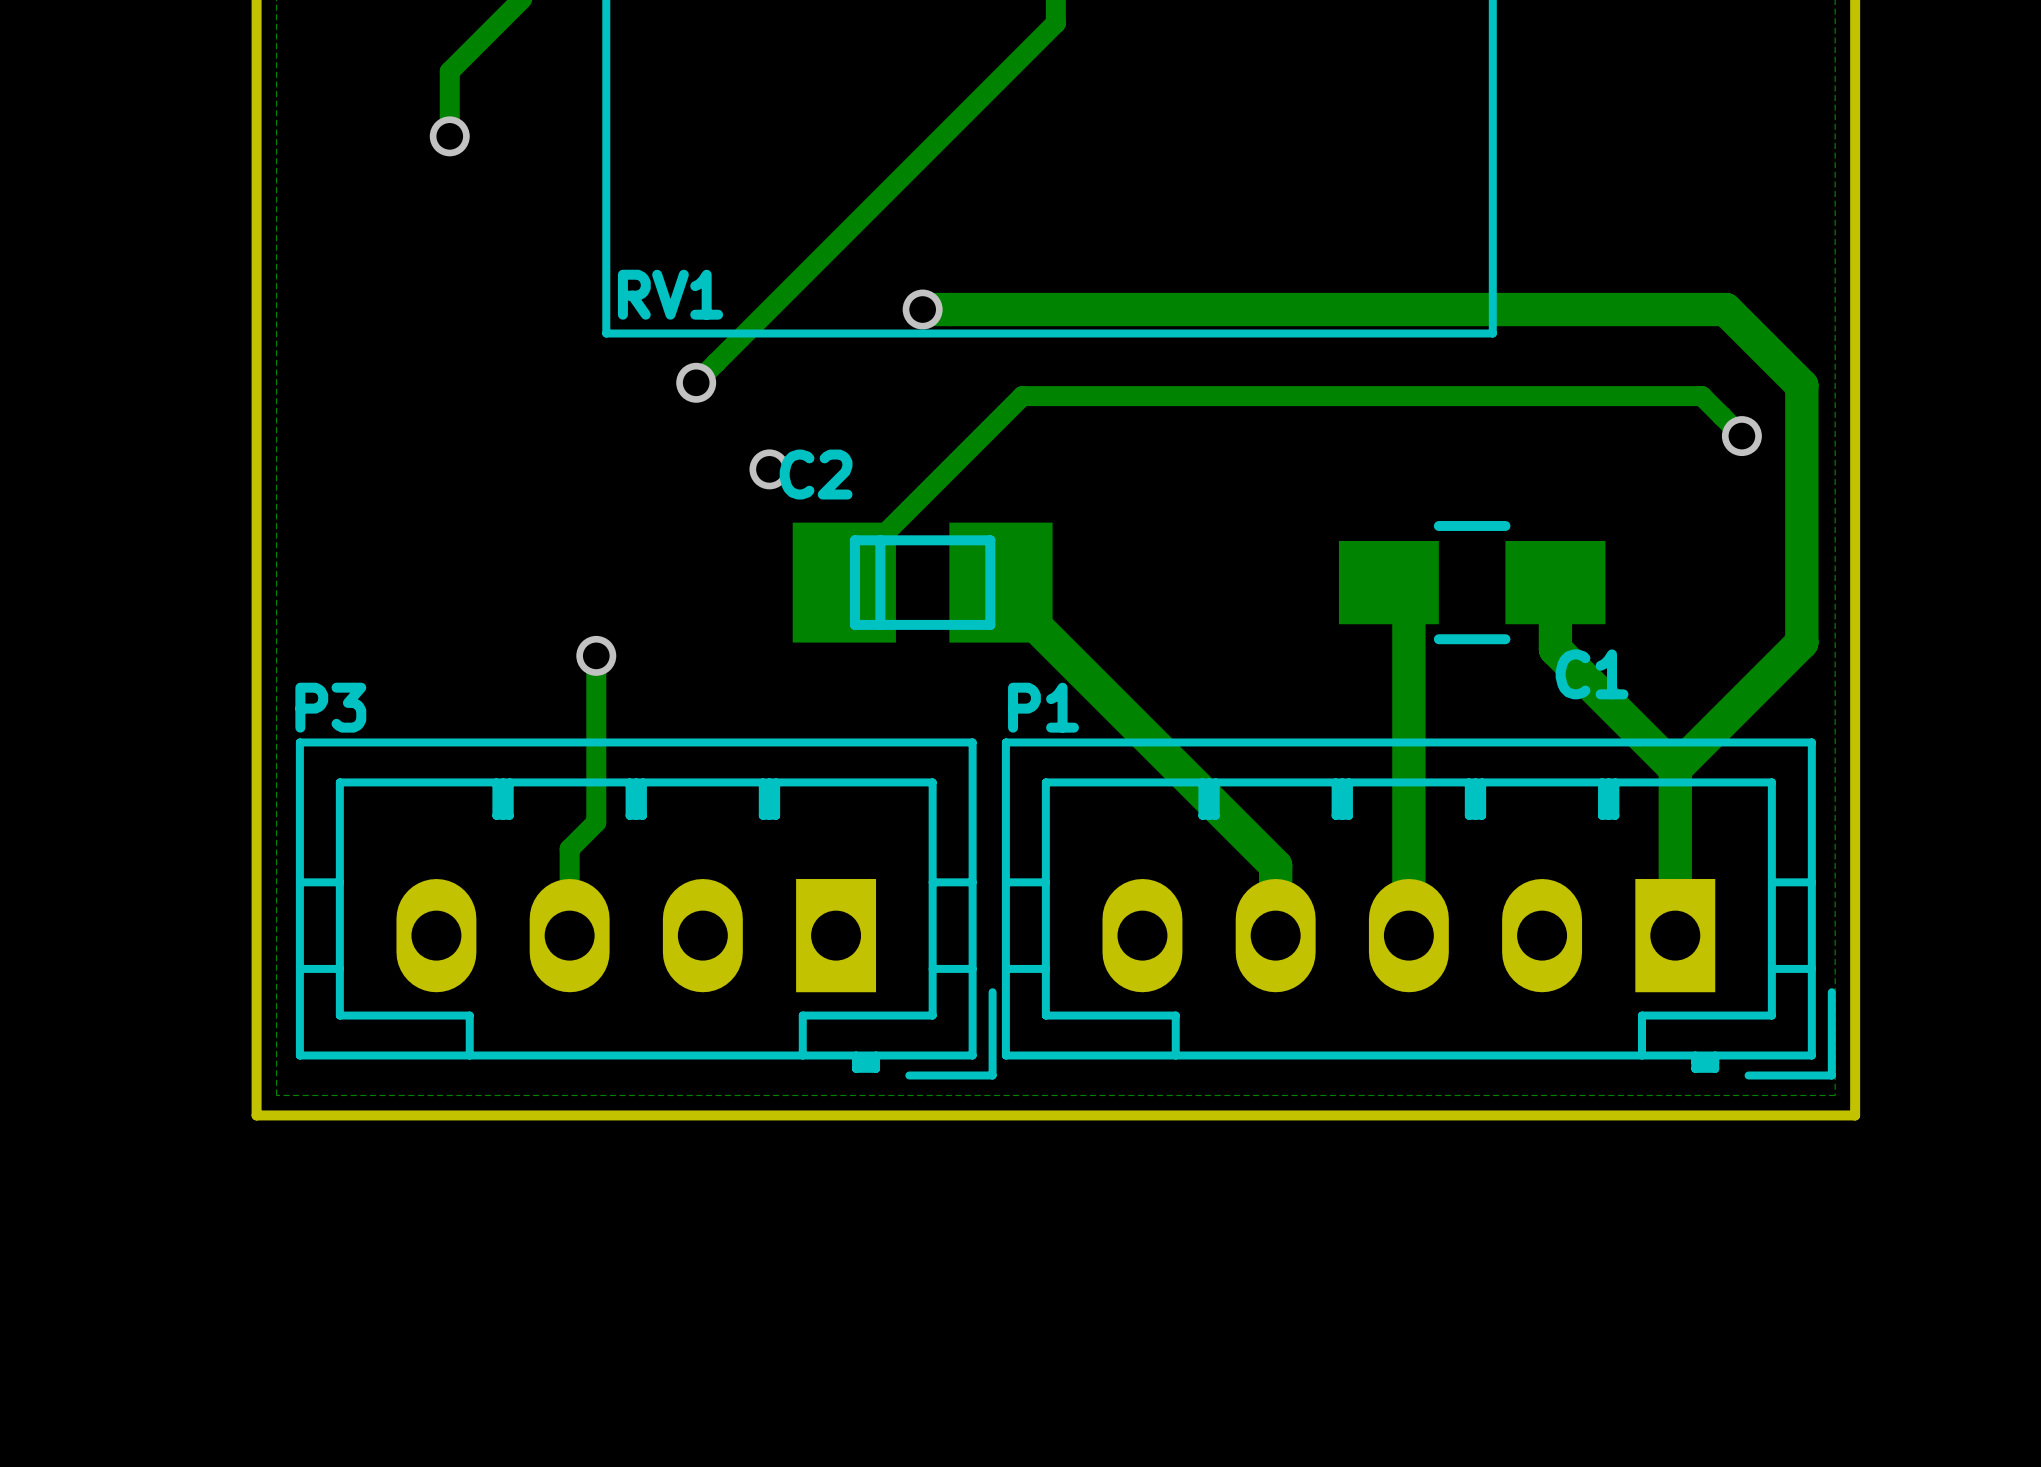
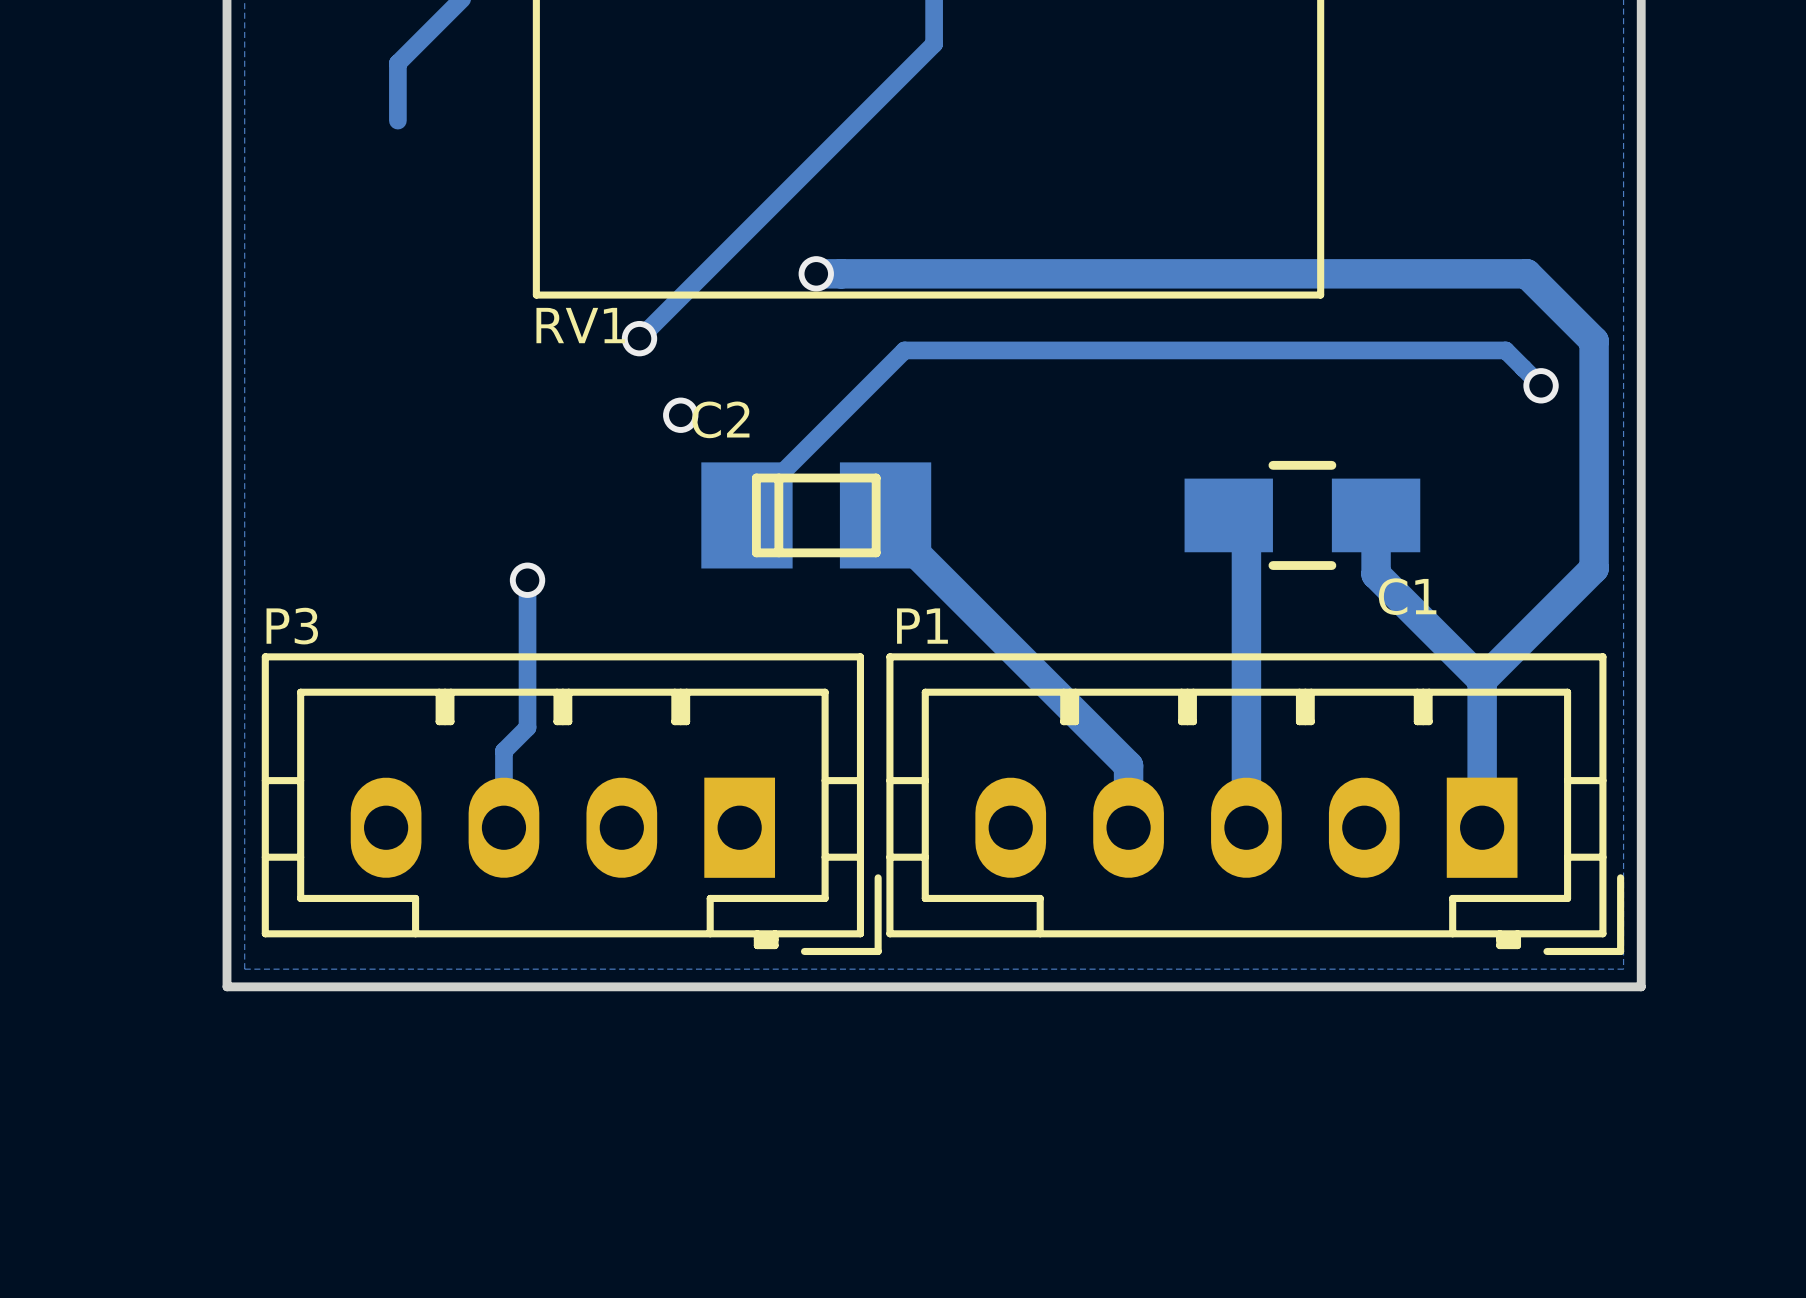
track: (1055, 23) (696, 382) -> (934, 20) (934, 44) (639, 338)
via: (449, 136) -> none
RV1 name position: RV1 (670, 294) -> RV1 (580, 325)
via position: (696, 382) -> (639, 338)

